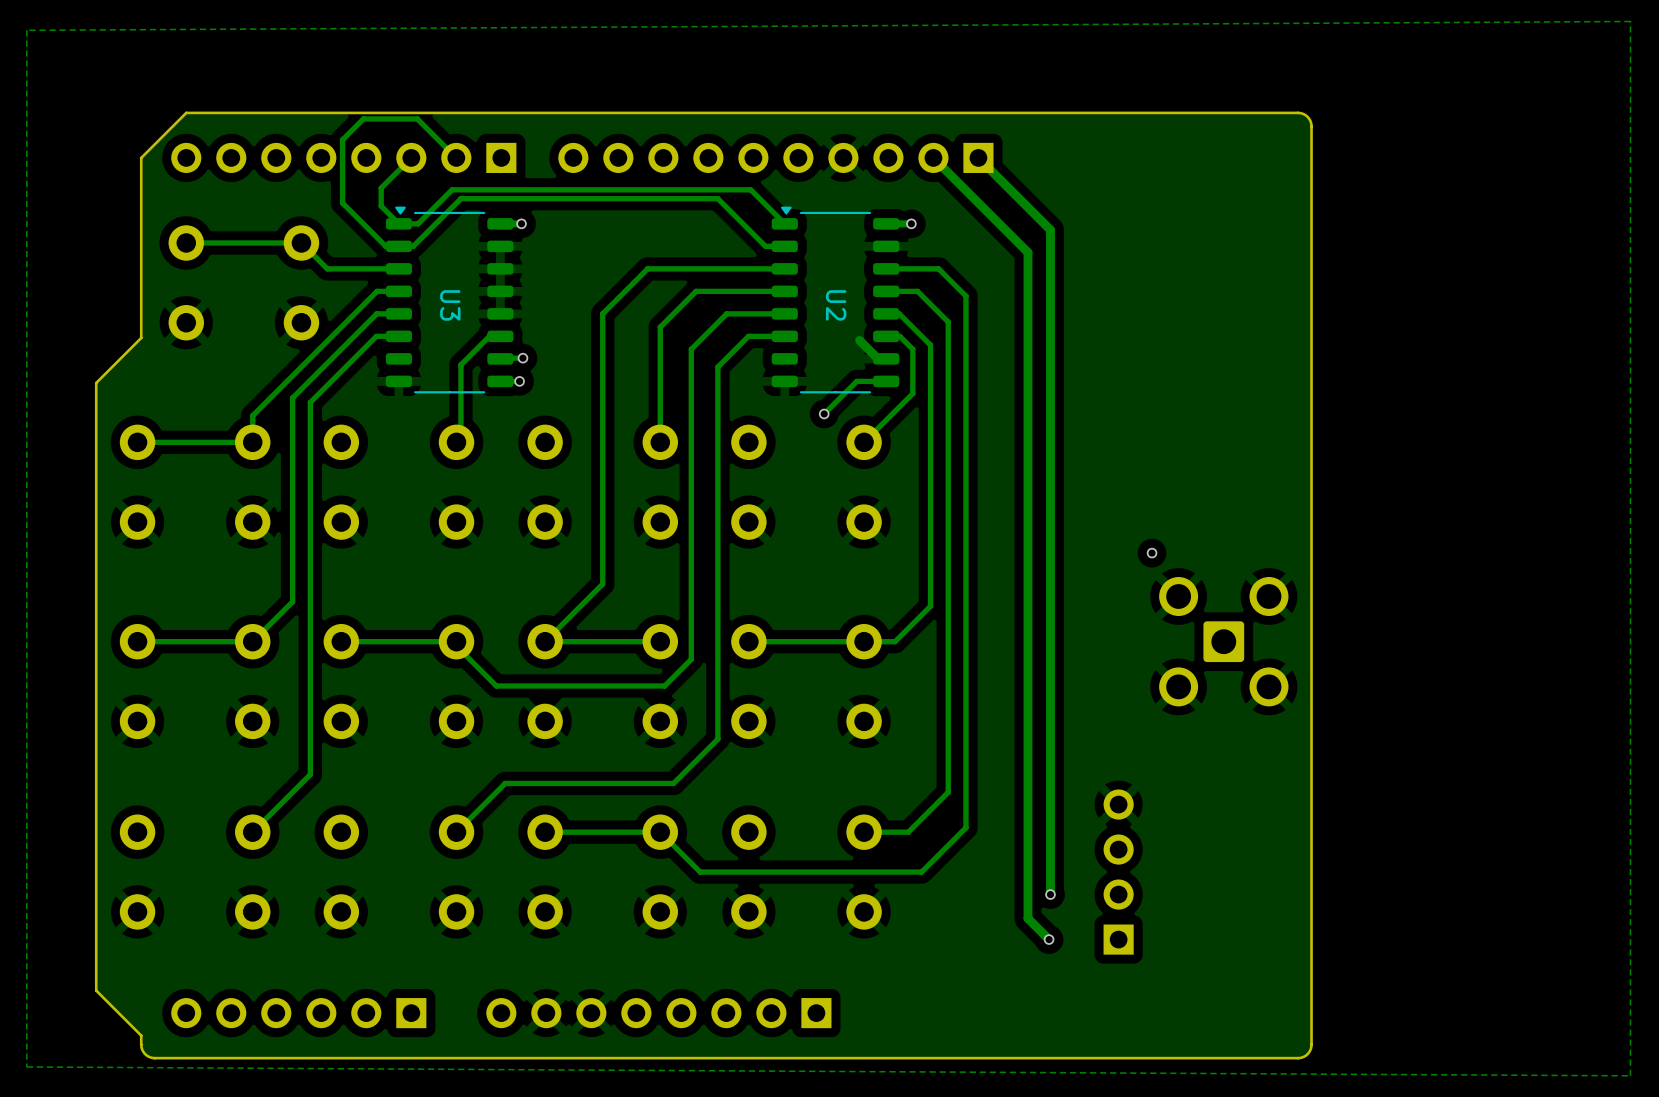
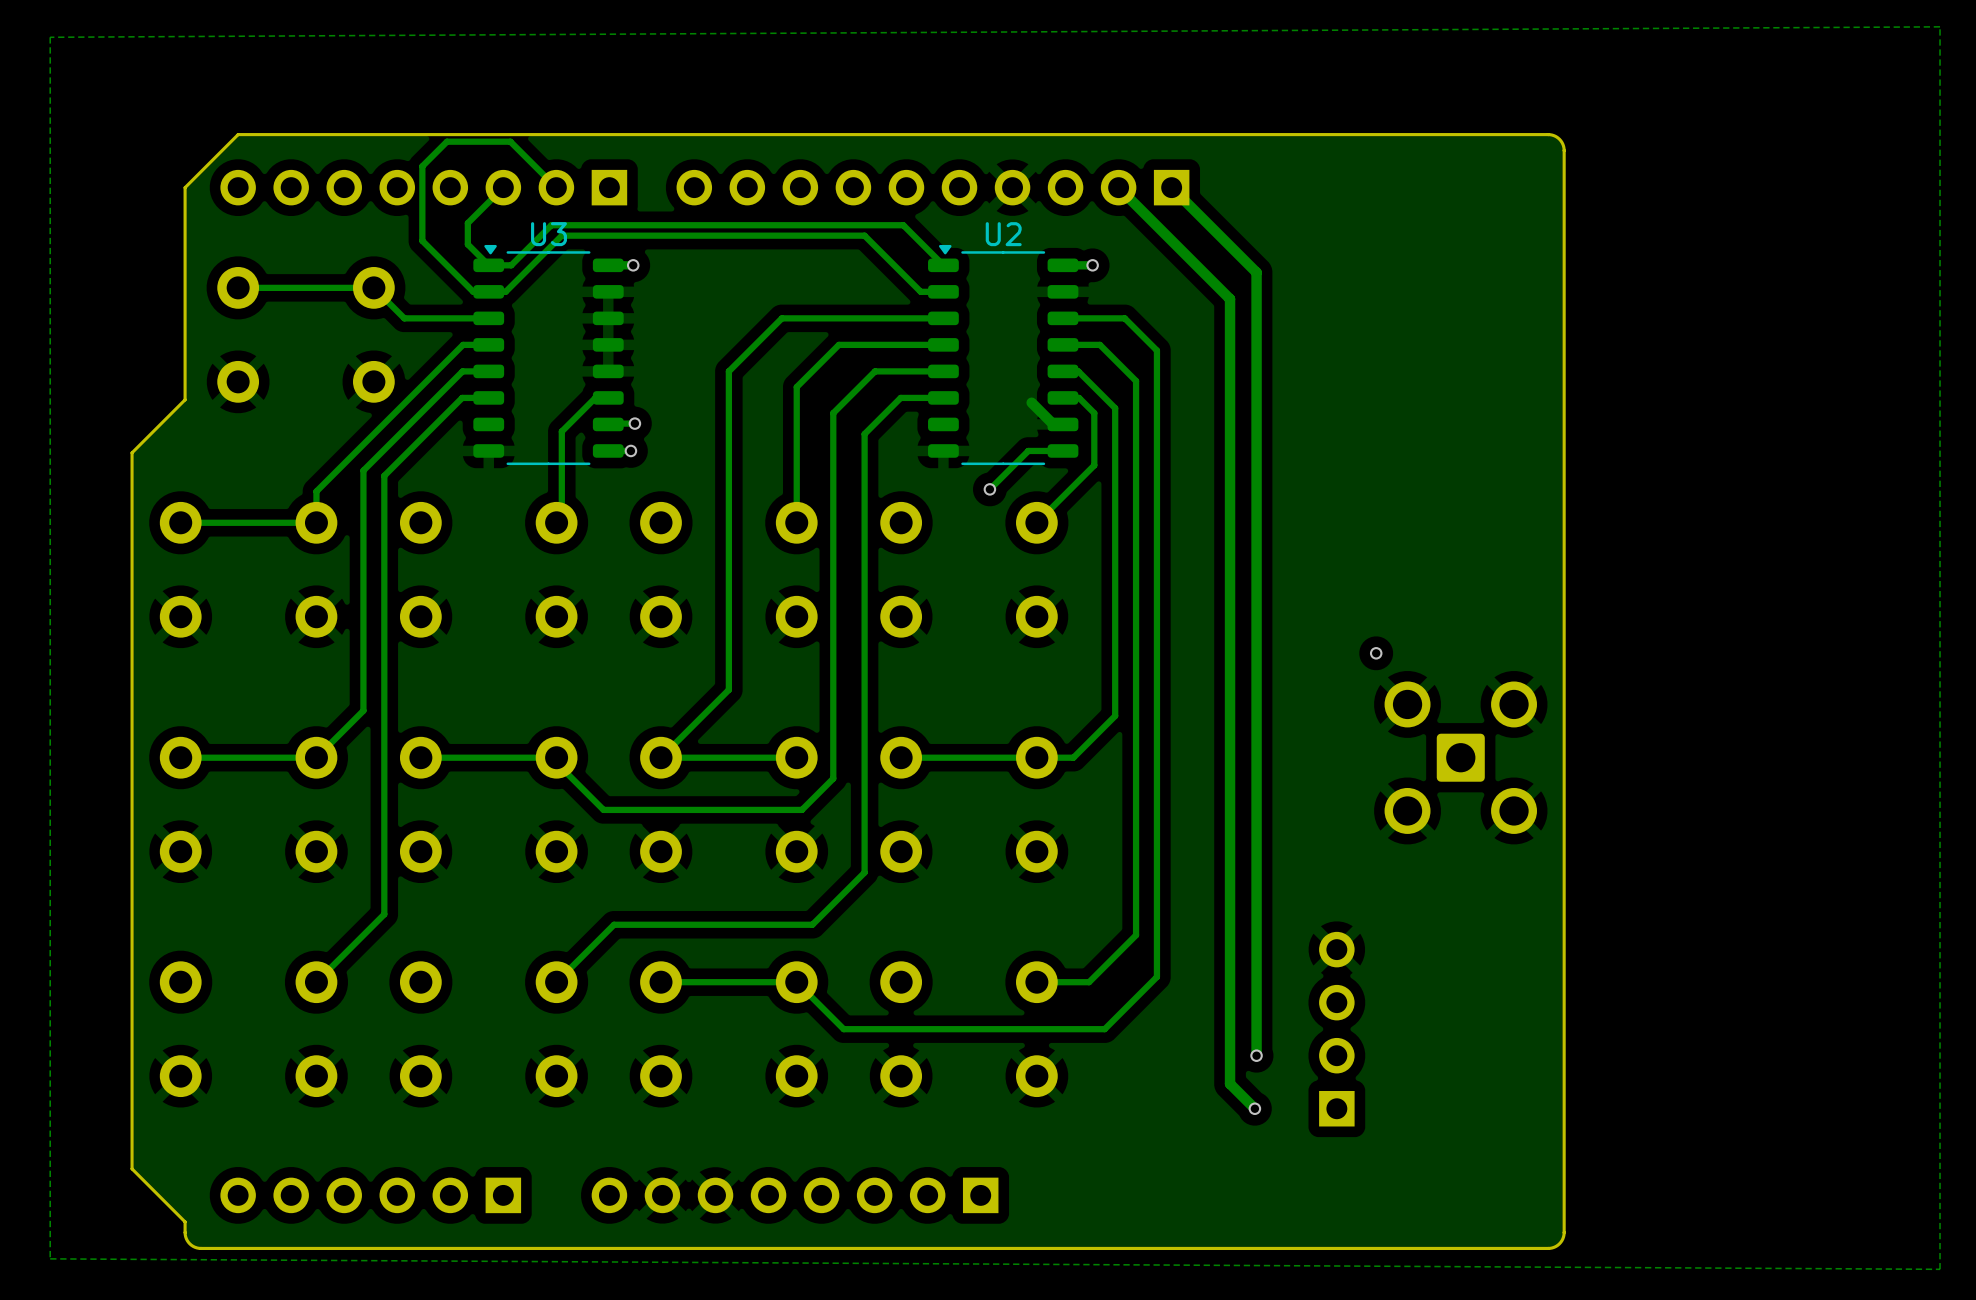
U3 name rotation: 0° (450, 305) -> 90° counterclockwise (549, 234)
U3 name position: U3 (450, 305) -> U3 (549, 234)
U2 name rotation: 0° (836, 305) -> 90° counterclockwise (1003, 234)
U2 name position: U2 (836, 305) -> U2 (1003, 234)

